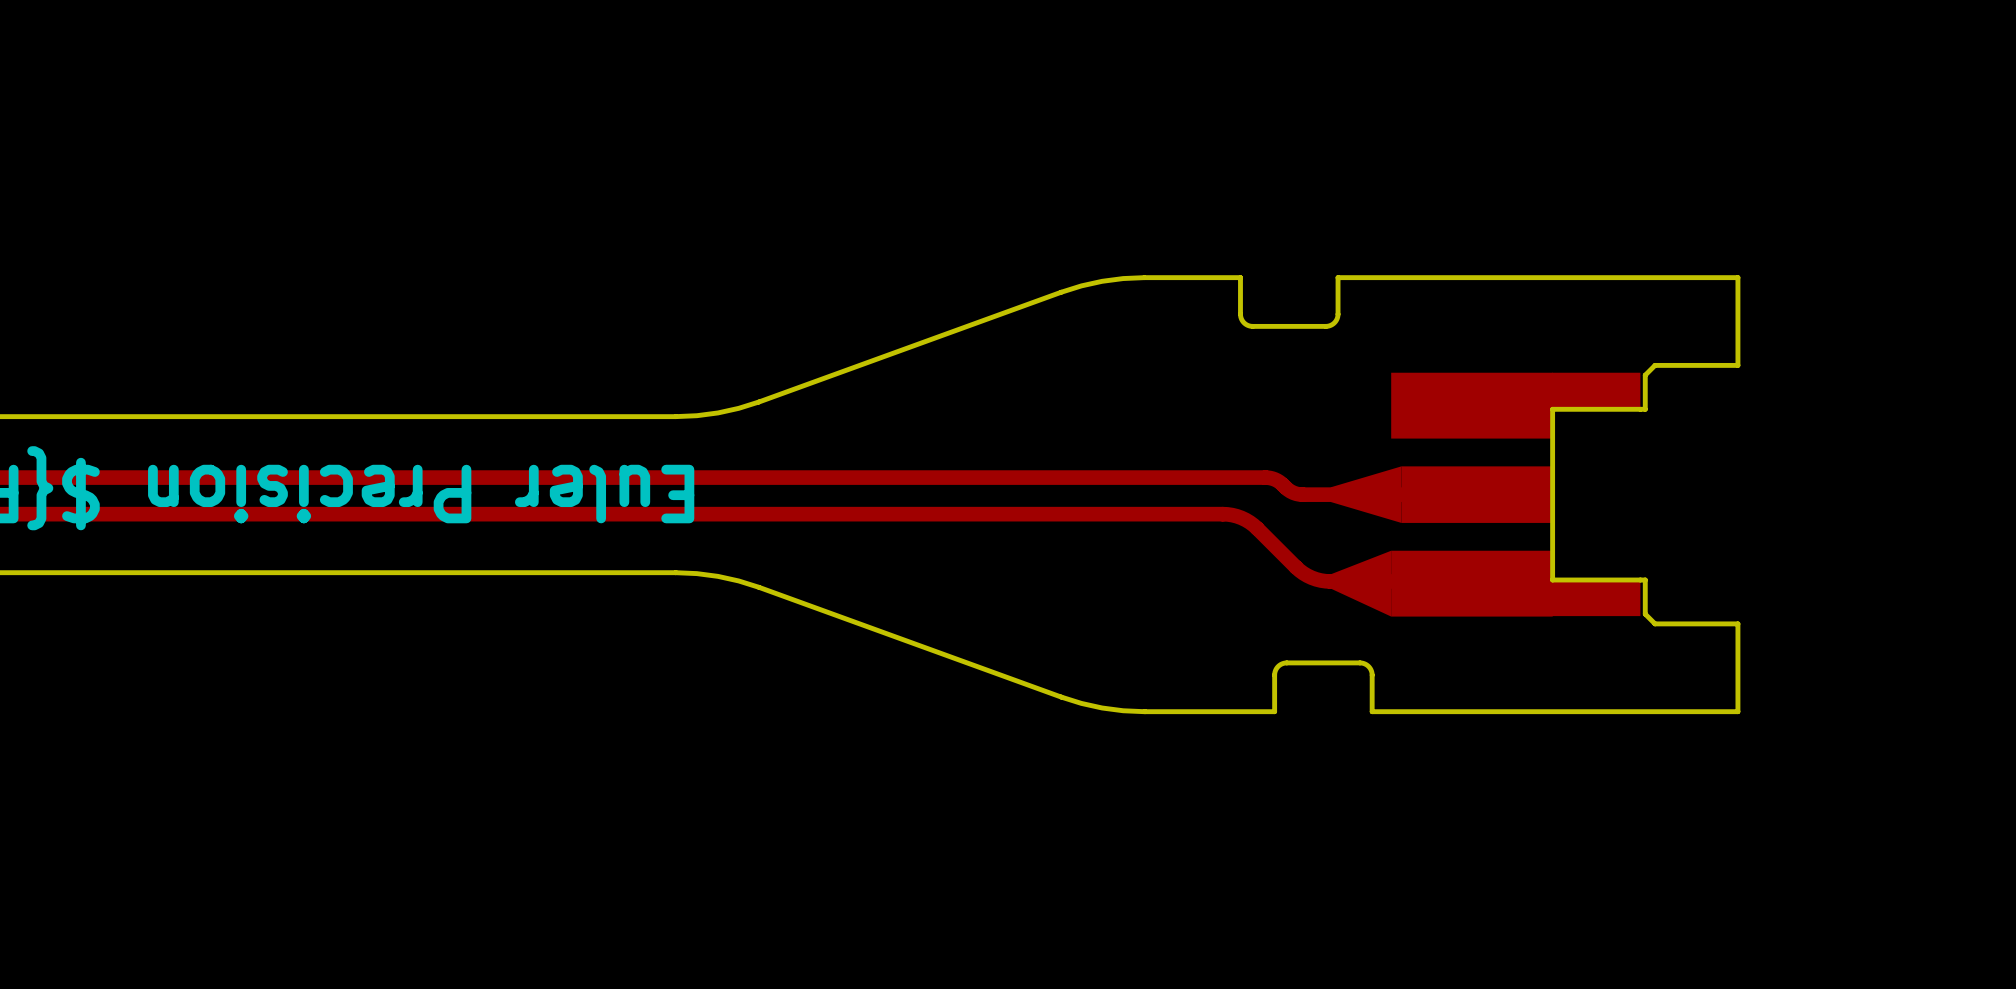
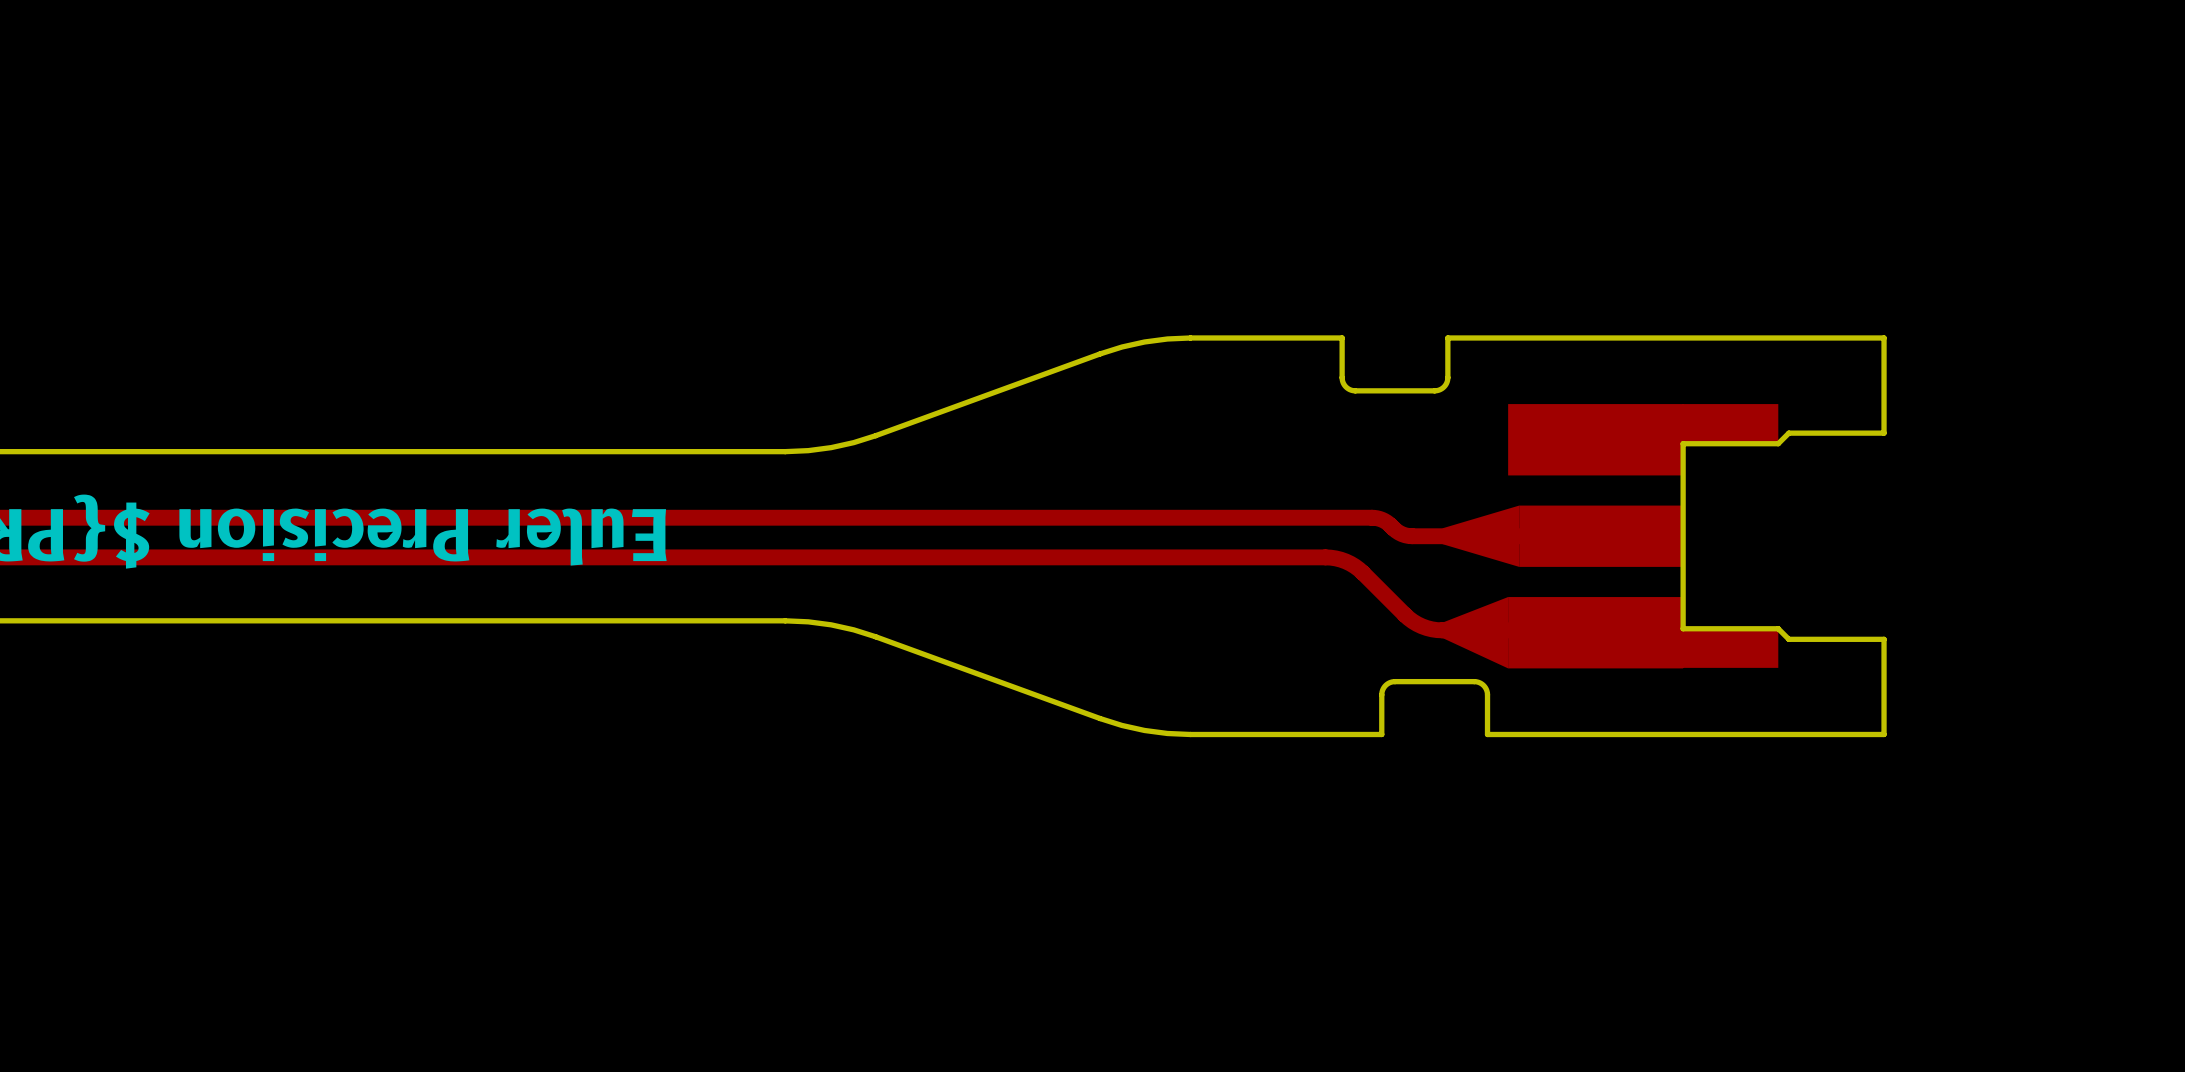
board edge: (1737, 311) (1737, 277) (1338, 277) (1337, 315) (1332, 324) (1325, 326) (1252, 326) (1245, 323) (1240, 316) (1240, 277) (1123, 278) (1081, 285) (1061, 292) (738, 408) (718, 412) (675, 416) -> (1884, 337) (1447, 337) (1447, 380) (1442, 387) (1434, 390) (1355, 390) (1348, 388) (1342, 379) (1342, 337) (1167, 338) (1122, 347) (1100, 353) (853, 442) (808, 450) (732, 451)
board edge: (1737, 365) (1655, 365) (1645, 375) (1645, 409) (1640, 409) -> (1884, 396) (1884, 433) (1788, 433) (1778, 443)
board edge: (675, 572) (718, 576) (758, 587) (1061, 697) (1102, 707) (1144, 711) (1274, 711) (1274, 677) -> (732, 620) (808, 621) (853, 629) (1100, 718) (1144, 730) (1190, 734) (1381, 734)
board edge: (1640, 580) (1645, 580) (1645, 614) (1655, 623) (1737, 623) -> (1778, 628) (1788, 639) (1884, 639) (1884, 676)
board edge: (1372, 675) (1368, 666) (1359, 662) (1285, 662) (1277, 667) (1274, 675) -> (1487, 731) (1487, 691) (1482, 684) (1474, 681) (1389, 682) (1384, 686) (1381, 693) (1381, 731)
board edge: (1737, 677) (1737, 711) (1372, 711) (1372, 677) -> (1884, 734) (1487, 734)

